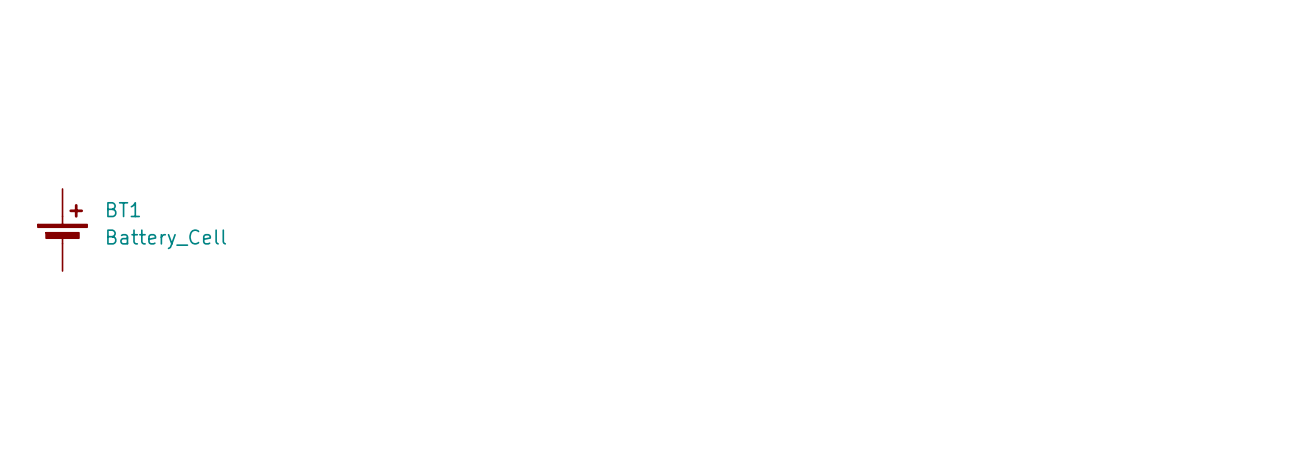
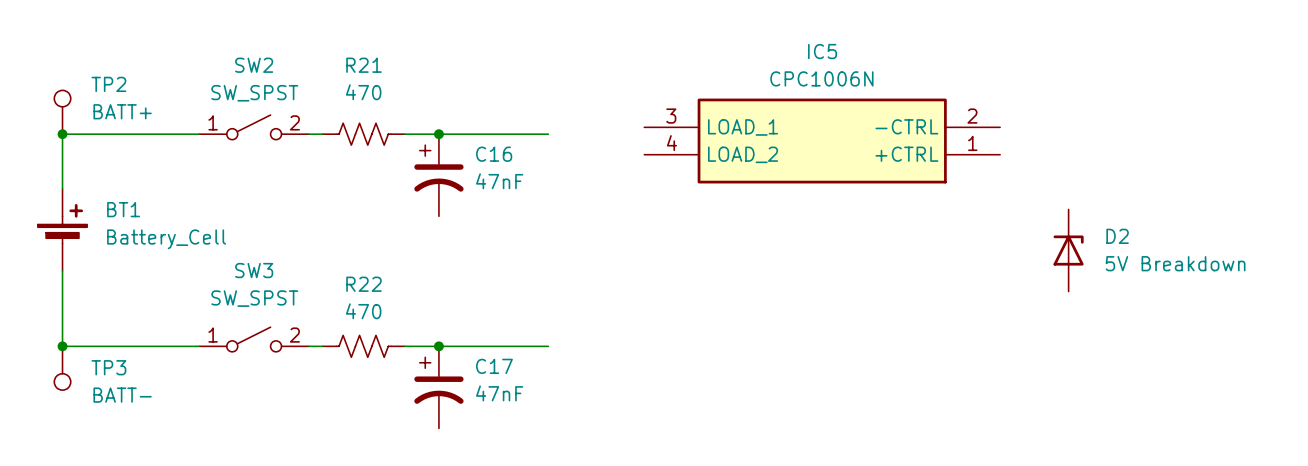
TP2: none -> BATT+ (62, 112)
SW2: none -> SW_SPST (254, 127)
junction: none -> (62, 134)
wire: none -> (199, 134) (62, 134) (62, 188)
wire: none -> (308, 134) (322, 134)
R21: none -> 470 (363, 134)
wire: none -> (404, 134) (548, 134)
junction: none -> (438, 134)
IC5: none -> CPC1006N (822, 141)
C16: none -> 47nF (438, 175)
D2: none -> 5V Breakdown (1068, 250)
wire: none -> (62, 271) (62, 346) (199, 346)
SW3: none -> SW_SPST (254, 339)
junction: none -> (62, 346)
wire: none -> (308, 346) (322, 346)
R22: none -> 470 (363, 346)
wire: none -> (404, 346) (548, 346)
junction: none -> (438, 346)
TP3: none -> BATT- (62, 368)
C17: none -> 47nF (438, 387)

